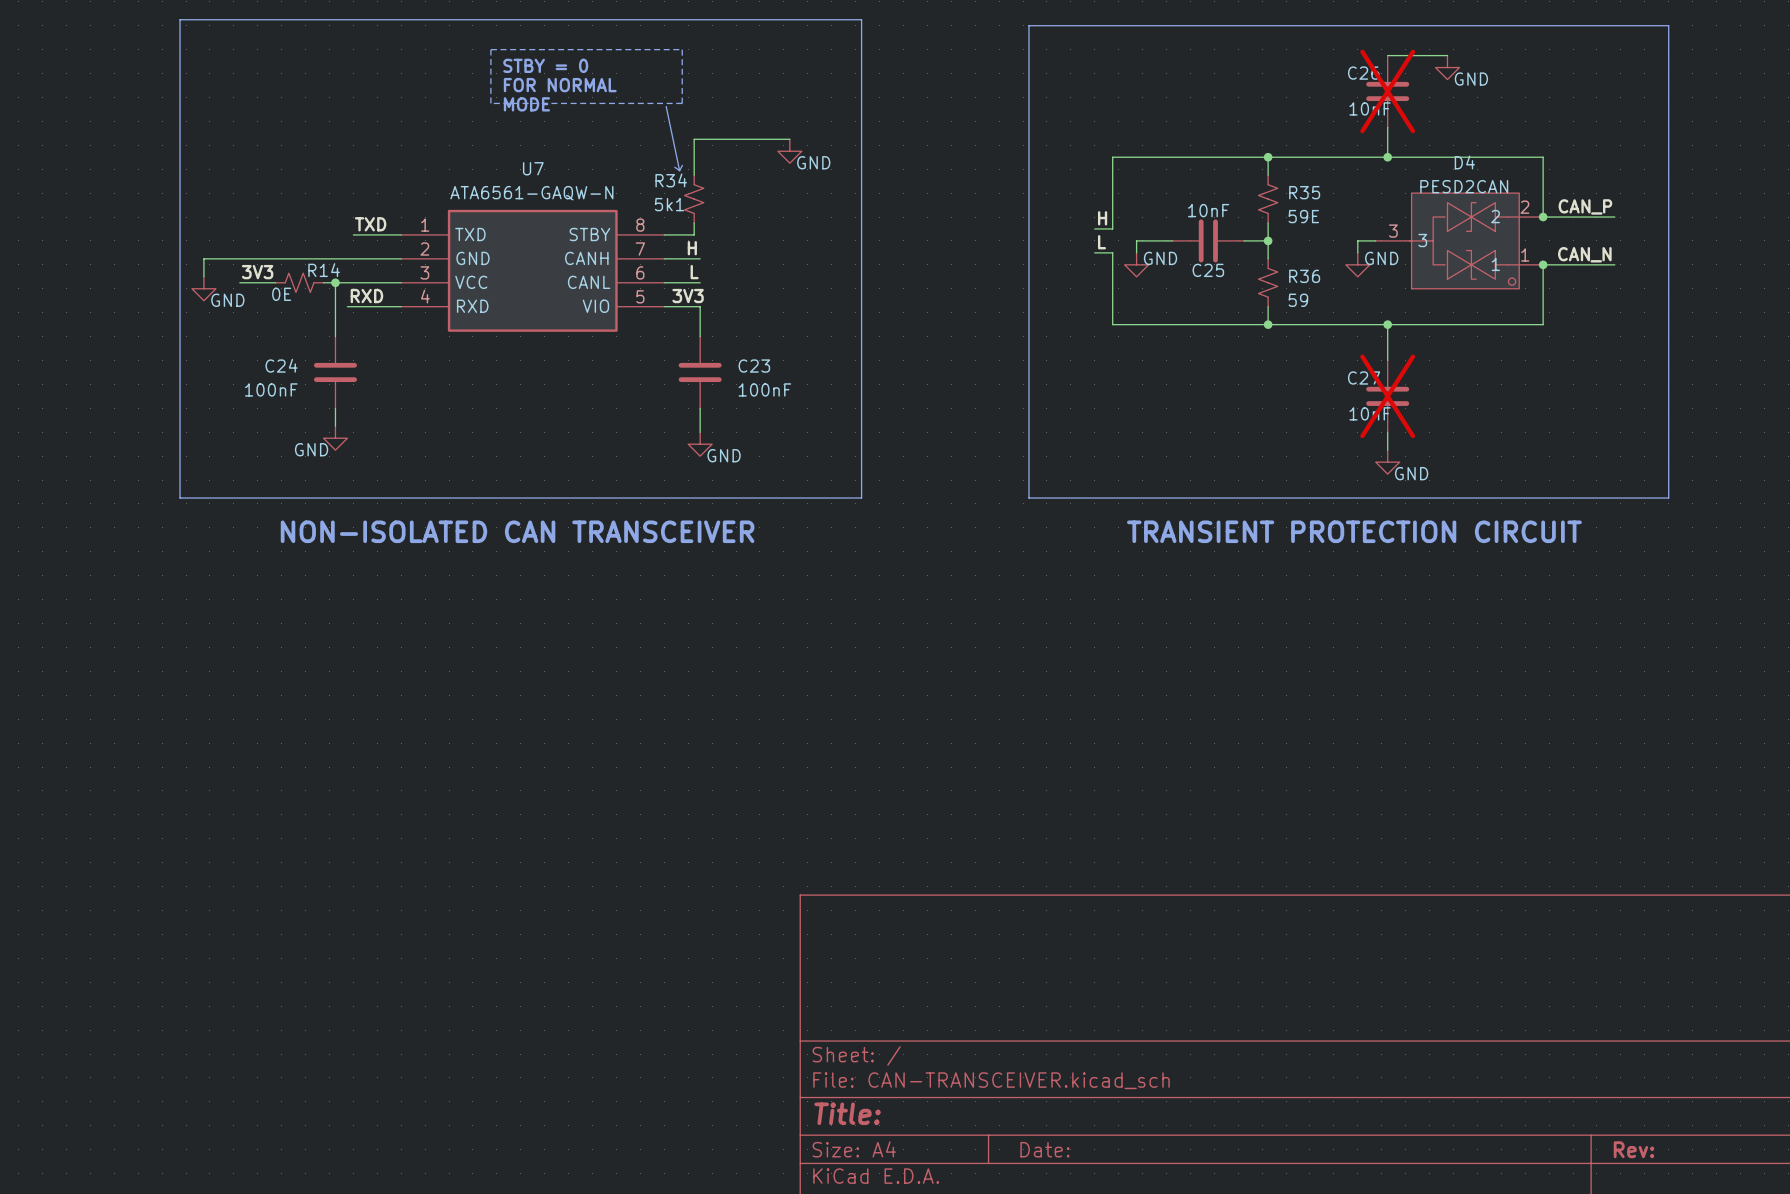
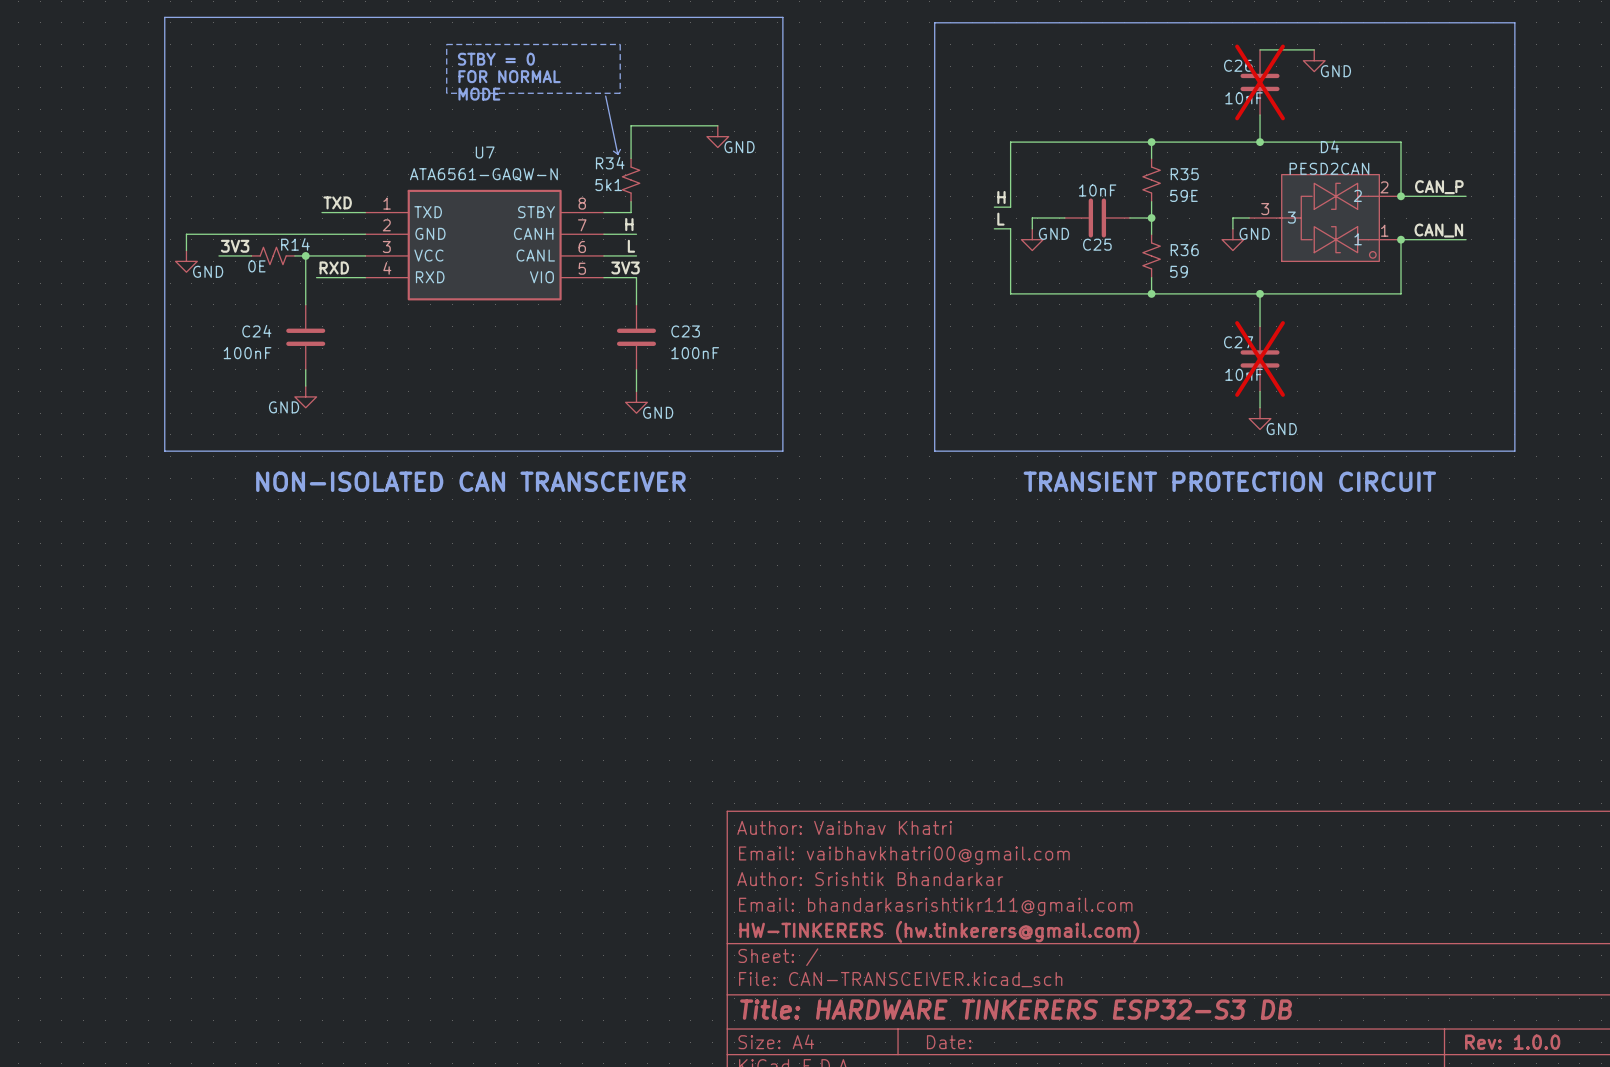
title block: none -> Author: Vaibhav Khatri (844, 827)
title block: none -> Email: vaibhavkhatri00@gmail.com (904, 855)
title block: none -> Author: Srishtik Bhandarkar (870, 879)
title block: none -> Email: bhandarkasrishtikr111@gmail.com (935, 906)
title block: none -> HW-TINKERERS (hw.tinkerers@gmail.com) (939, 931)
title block: Title: (847, 1113) -> Title: HARDWARE TINKERERS ESP32-S3 DB (1016, 1009)
title block: Rev: (1633, 1149) -> Rev: 1.0.0 (1512, 1042)

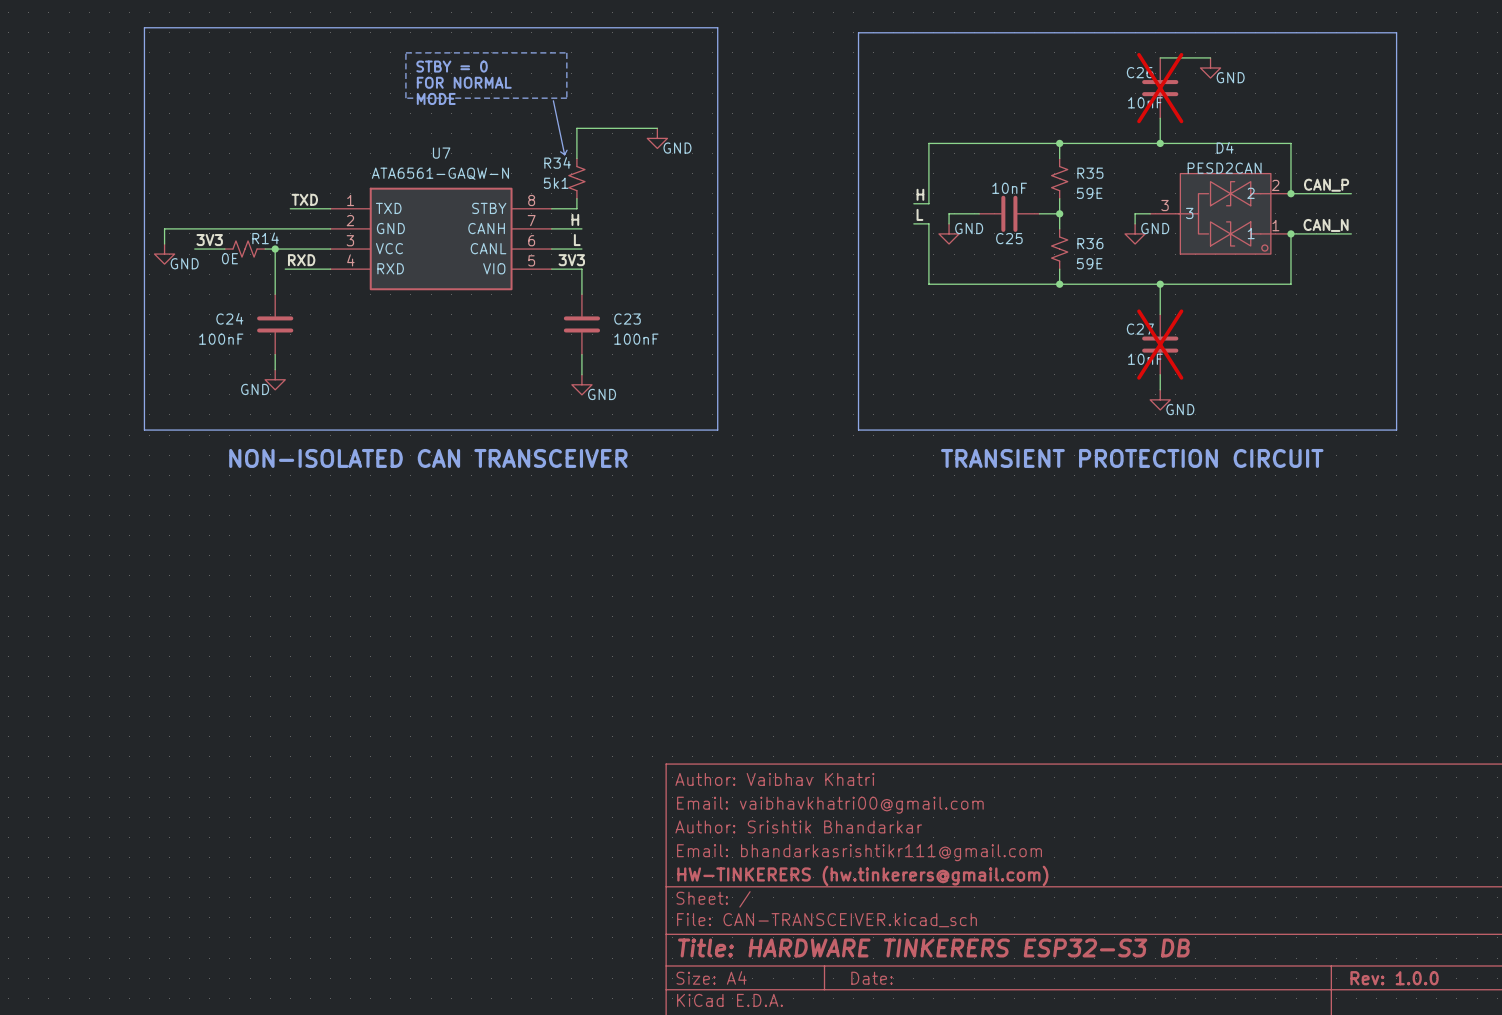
R36 value: 59 (1179, 271) -> 59E (1089, 263)

